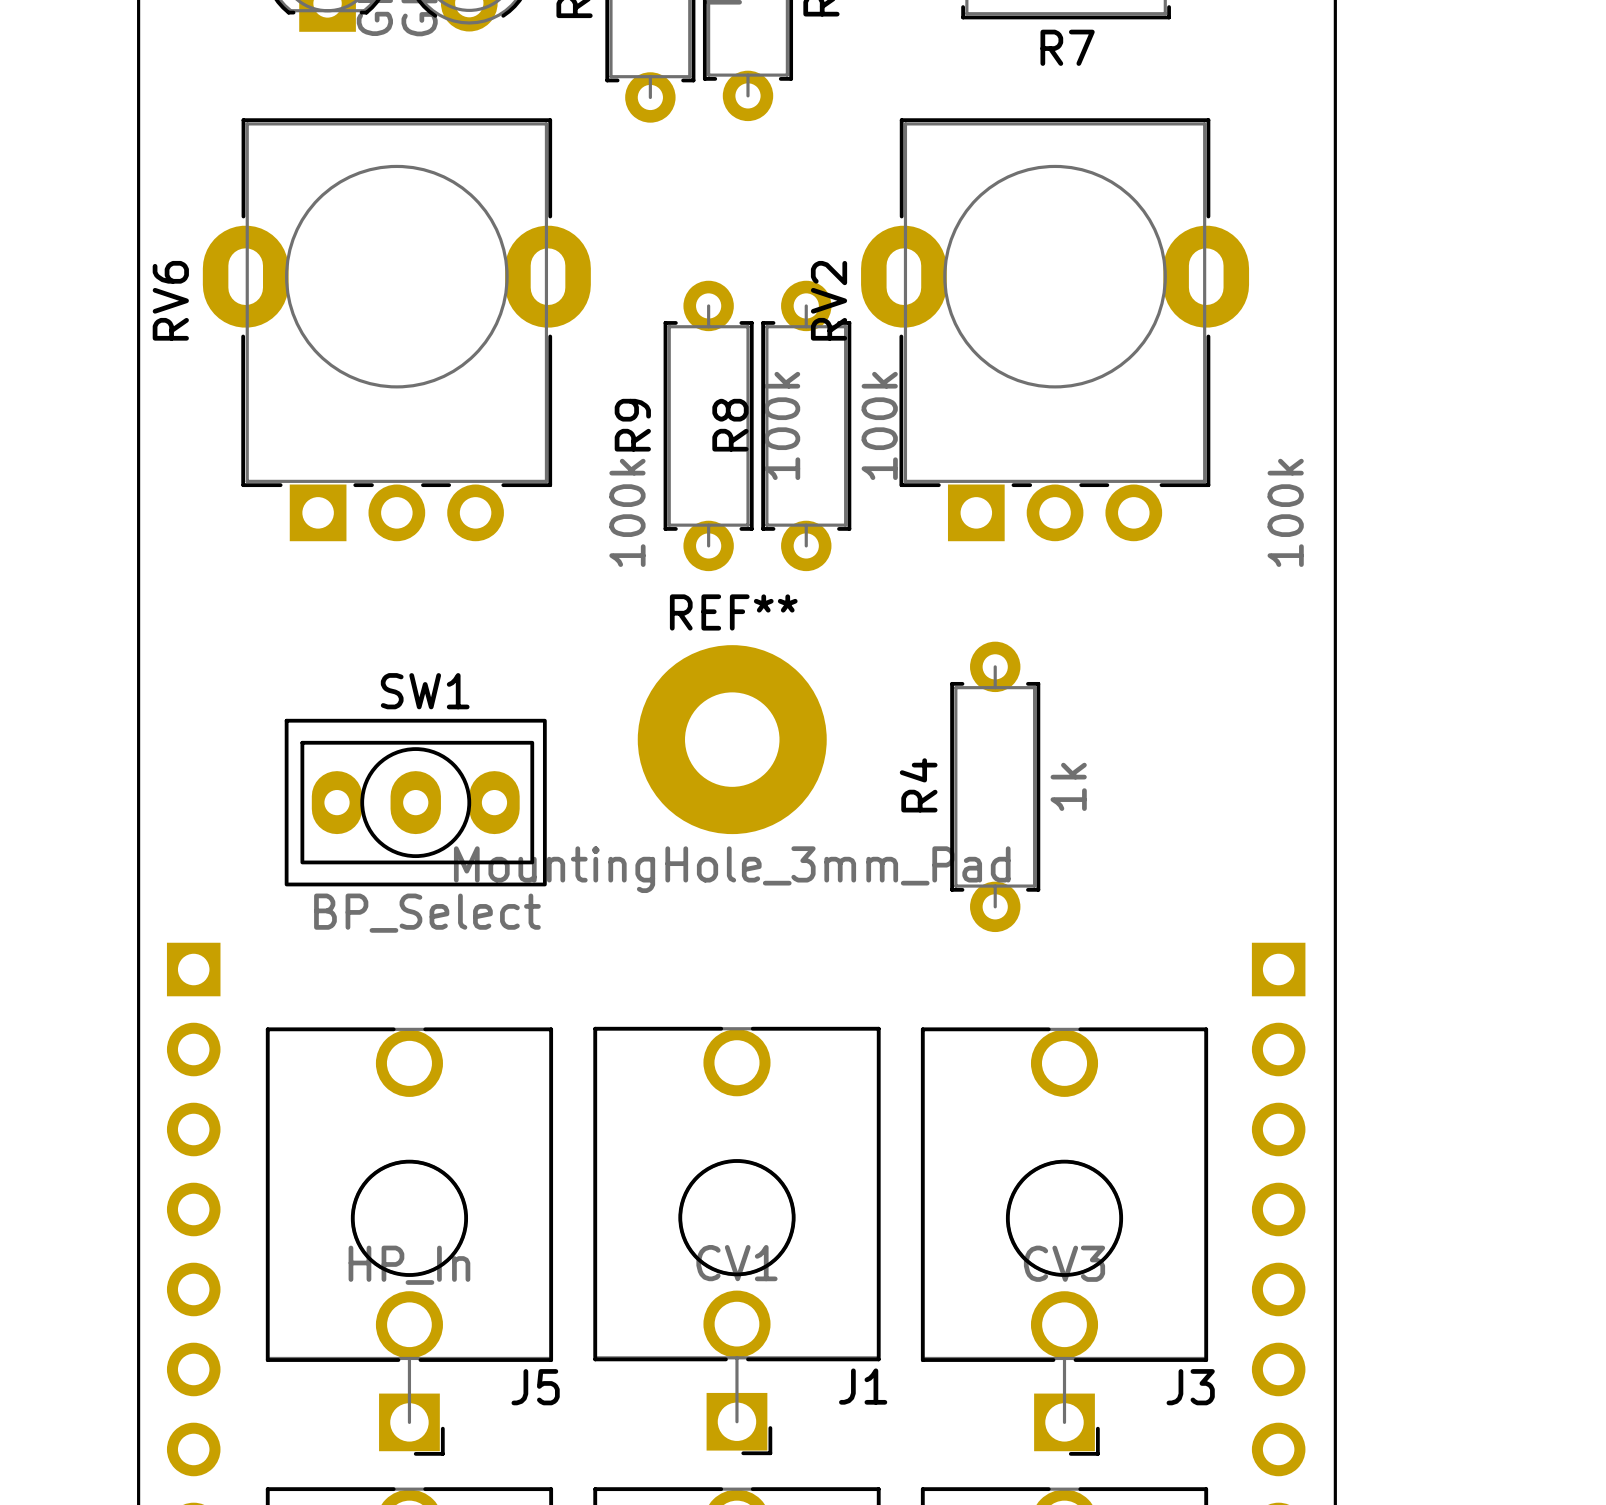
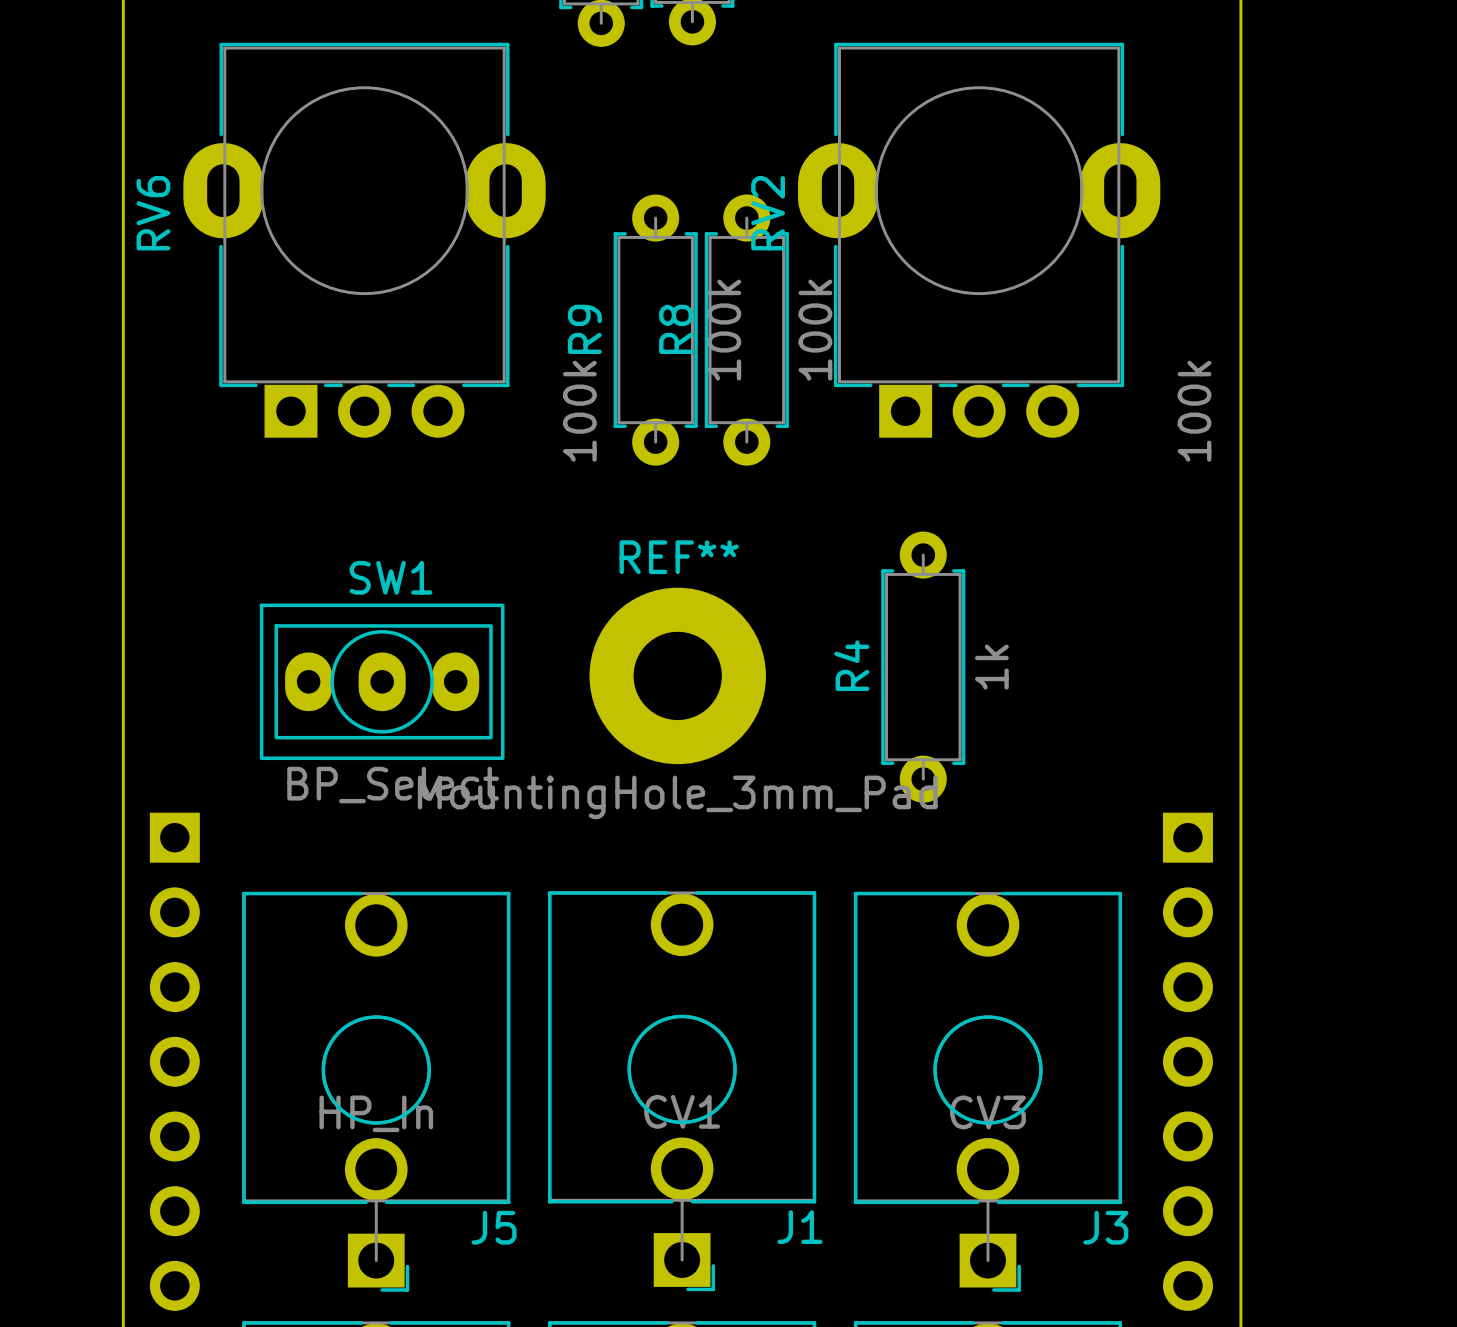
REF** position: (732, 739) -> (677, 675)

